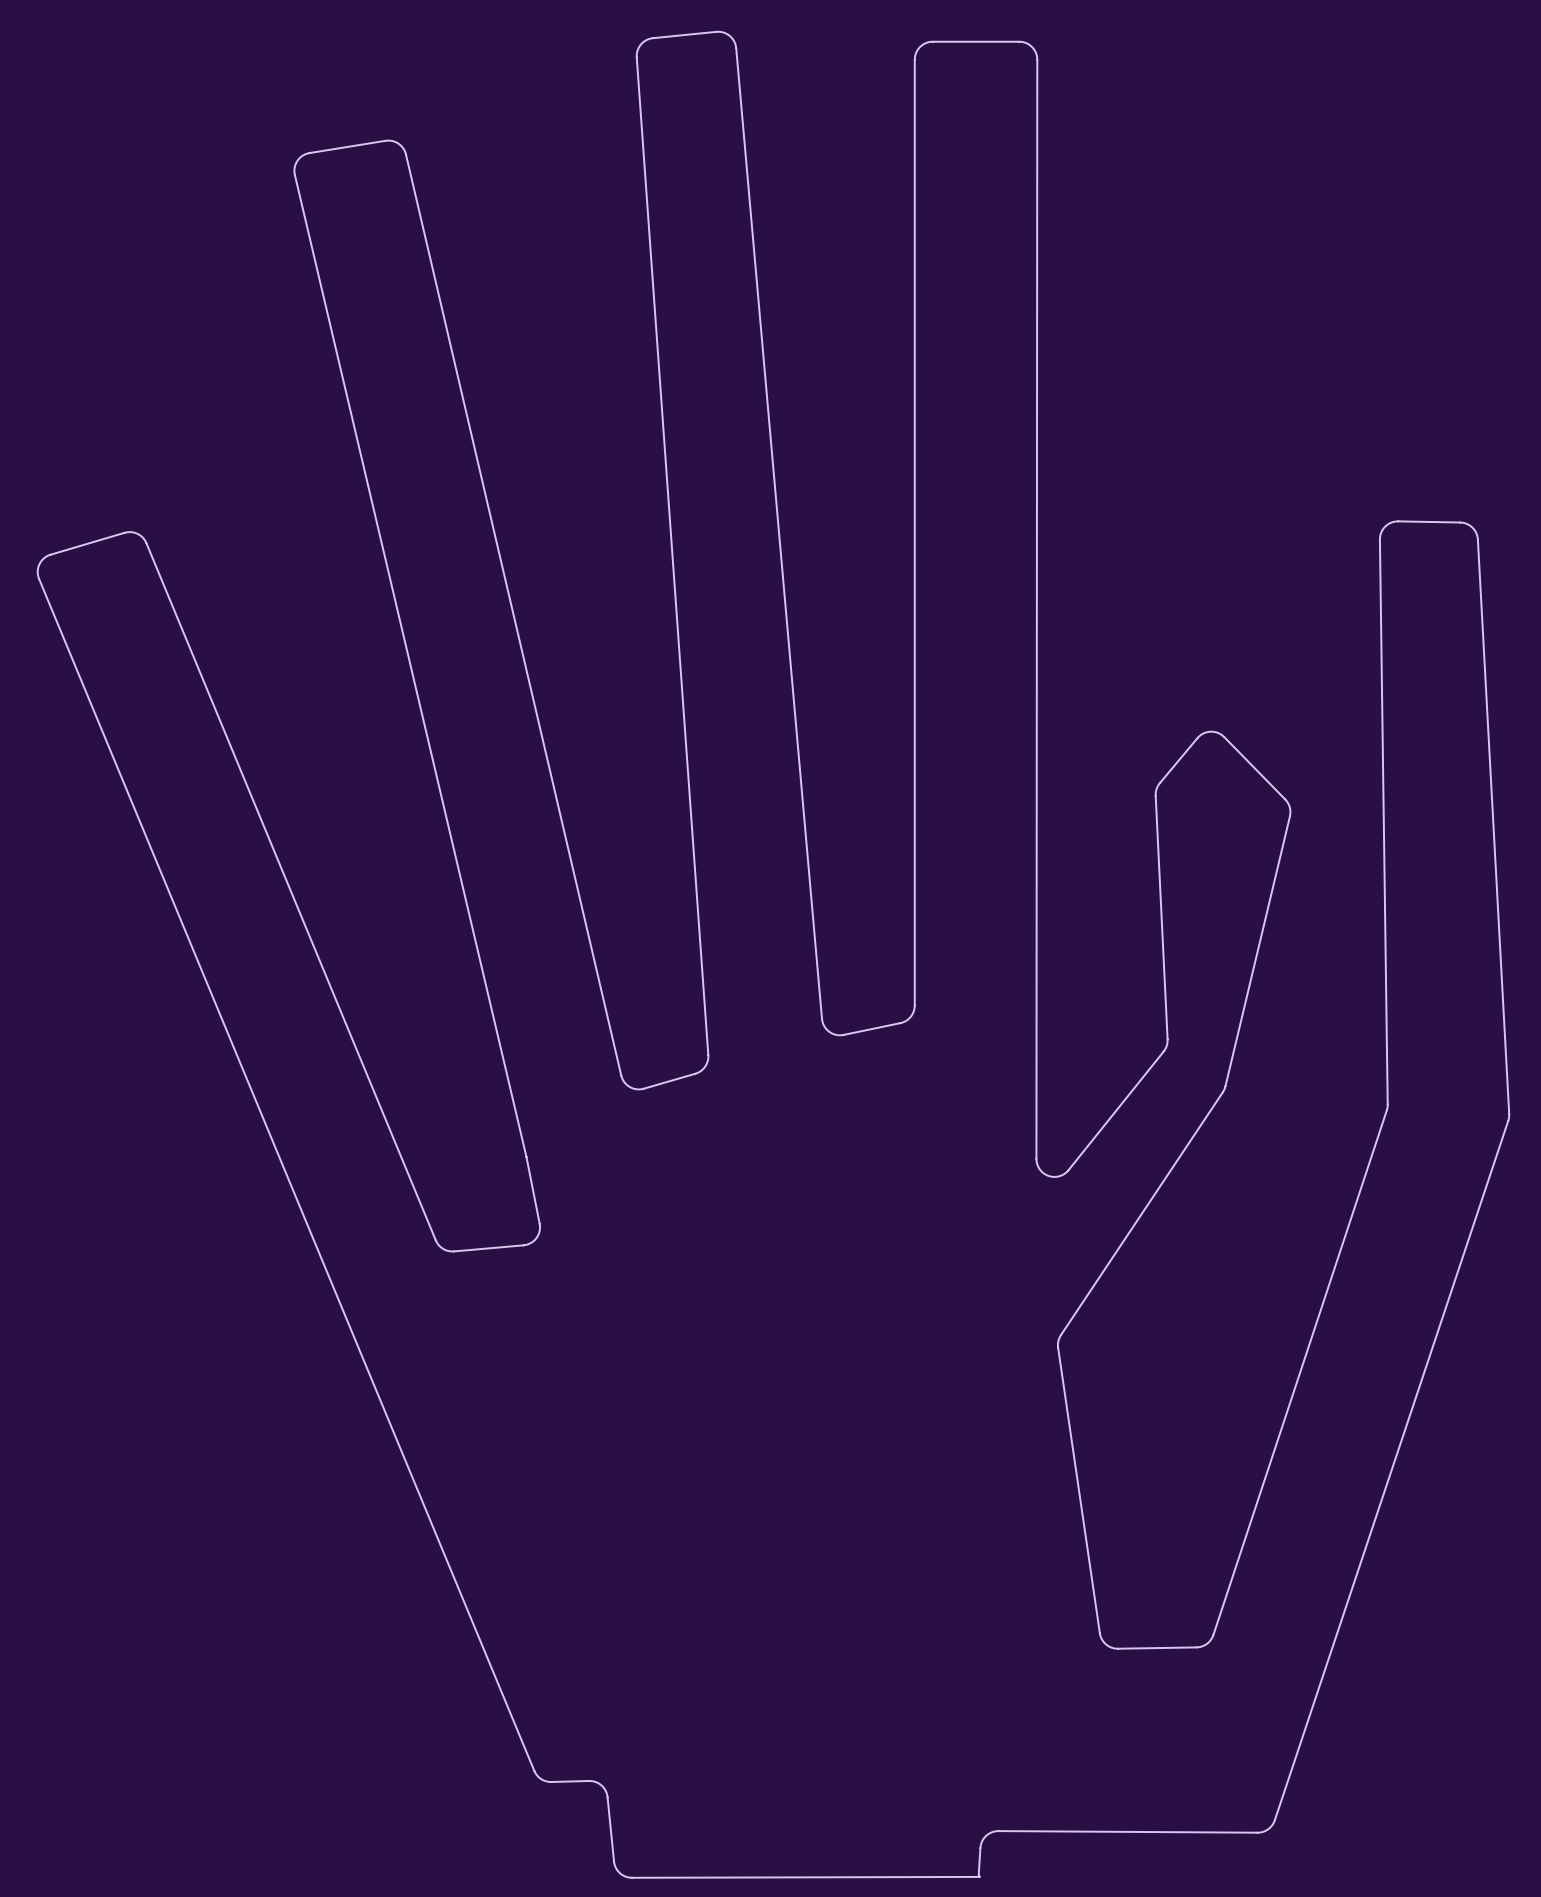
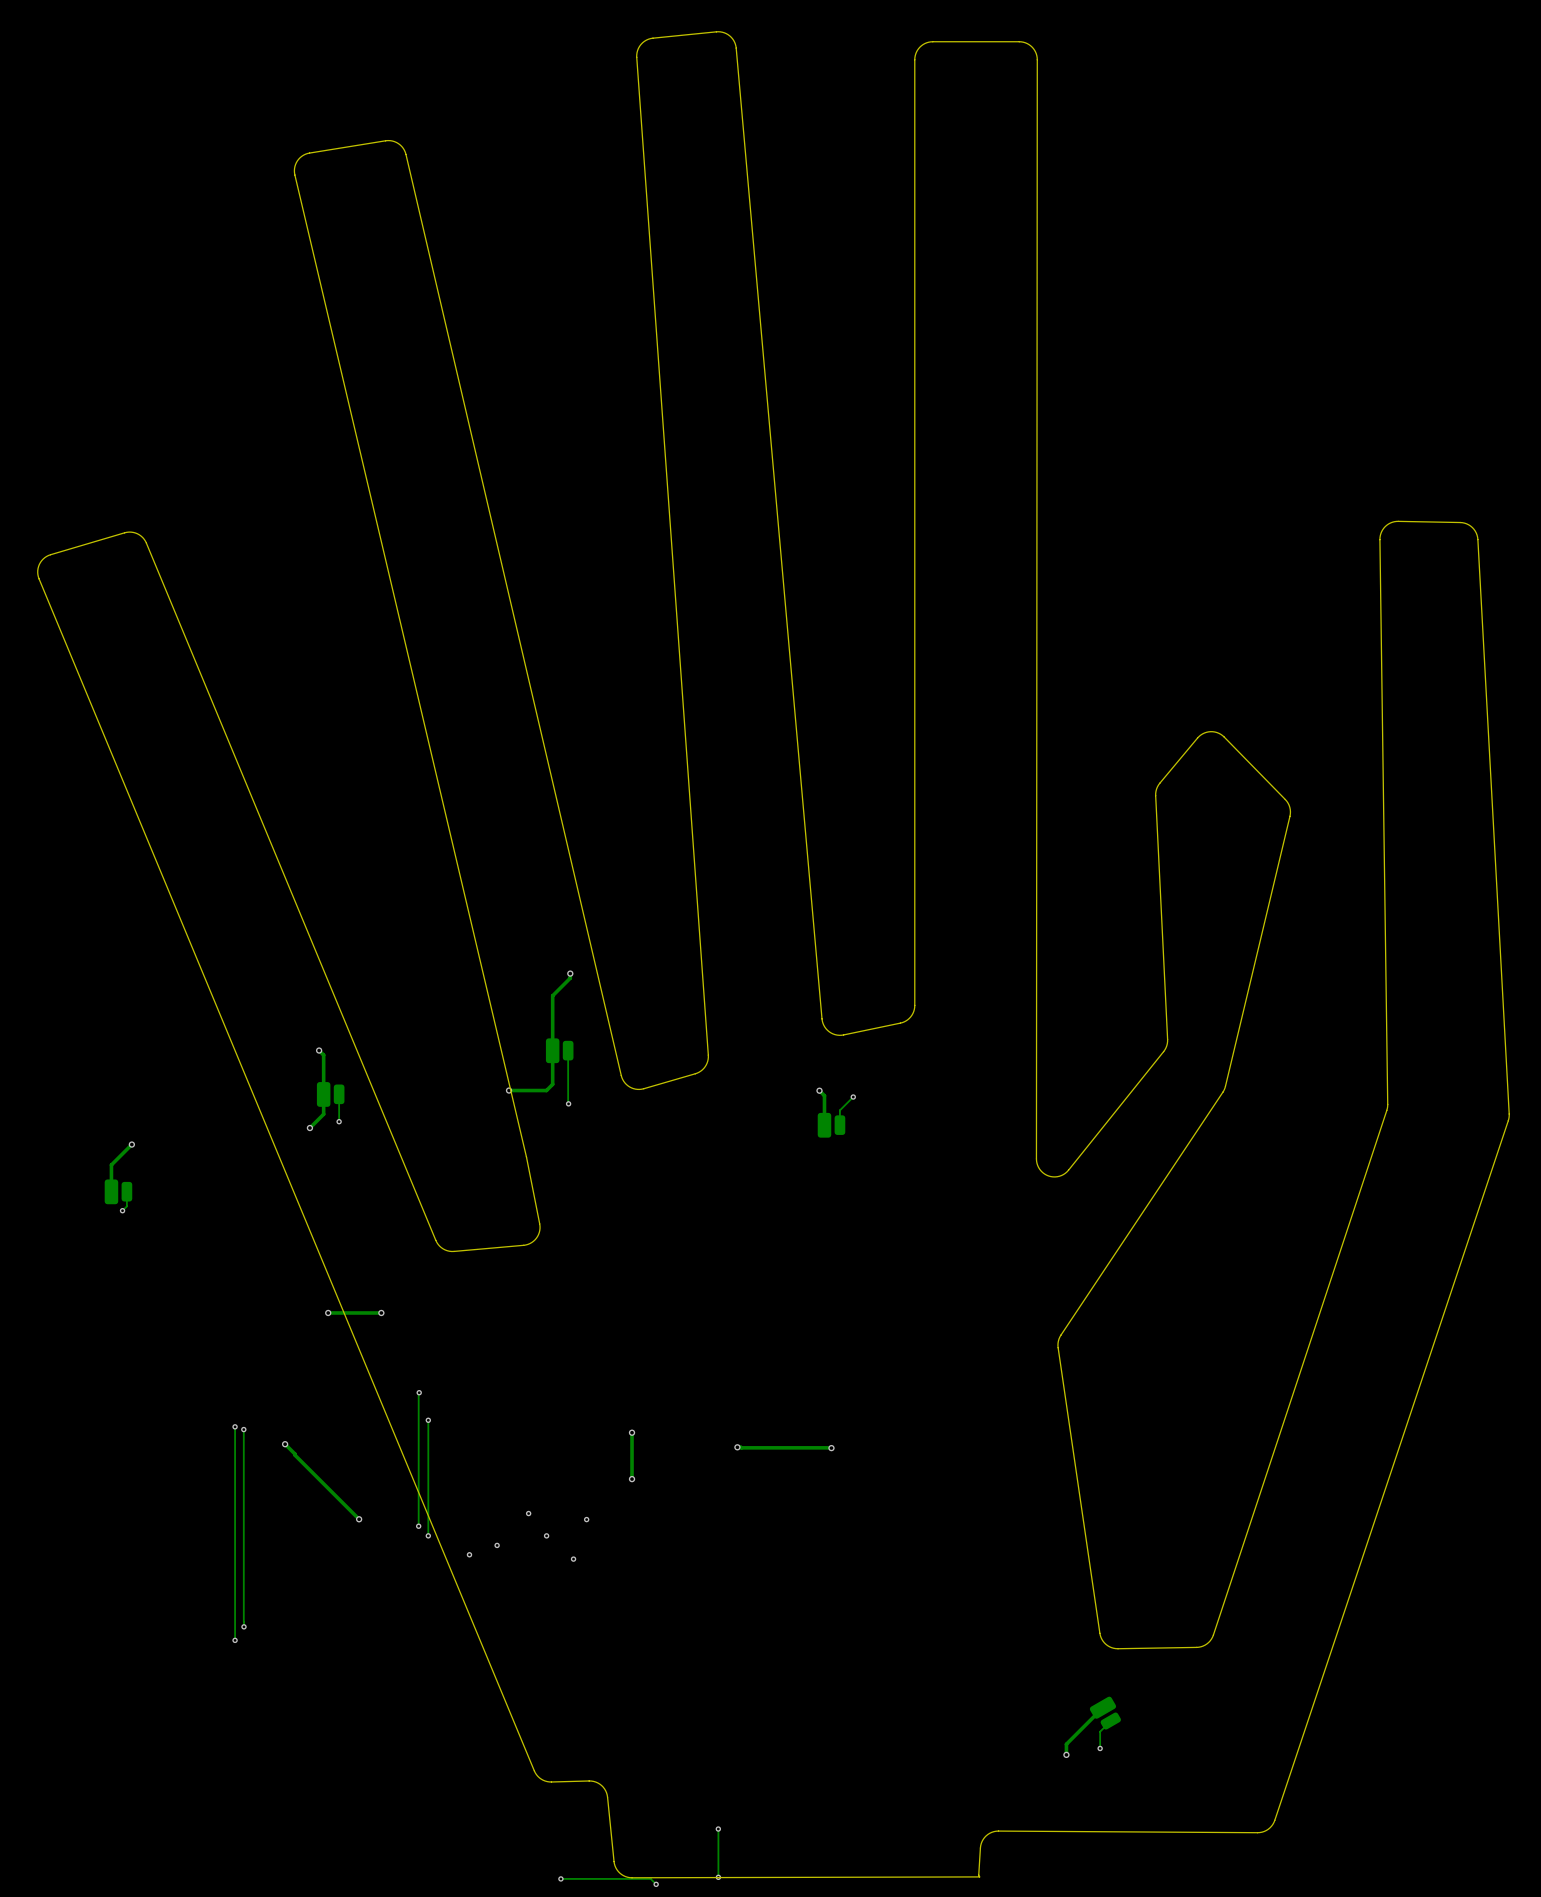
track: none -> (570, 973) (570, 978) (552, 995) (552, 1084) (546, 1090) (509, 1090)
via: none -> (570, 973)
track: none -> (319, 1050) (323, 1055) (323, 1114) (309, 1128)
via: none -> (319, 1050)
part: none -> (559, 1050)
track: none -> (568, 1050) (568, 1103)
via: none -> (509, 1090)
track: none -> (819, 1090) (824, 1095) (824, 1125)
via: none -> (819, 1090)
part: none -> (330, 1094)
track: none -> (339, 1094) (339, 1121)
track: none -> (853, 1097) (839, 1110) (839, 1125)
via: none -> (853, 1097)
via: none -> (568, 1103)
via: none -> (339, 1121)
part: none -> (831, 1125)
via: none -> (309, 1128)
track: none -> (131, 1144) (111, 1164) (111, 1191)
via: none -> (131, 1144)
part: none -> (118, 1191)
track: none -> (126, 1191) (126, 1206) (122, 1210)
via: none -> (122, 1210)
via: none -> (328, 1312)
track: none -> (381, 1312) (328, 1312)
via: none -> (381, 1312)
track: none -> (419, 1392) (418, 1526)
via: none -> (419, 1392)
track: none -> (428, 1420) (428, 1535)
via: none -> (428, 1420)
track: none -> (235, 1426) (235, 1640)
via: none -> (235, 1426)
track: none -> (243, 1429) (243, 1626)
via: none -> (243, 1429)
track: none -> (632, 1432) (632, 1479)
via: none -> (632, 1432)
track: none -> (285, 1444) (359, 1519)
via: none -> (285, 1444)
track: none -> (737, 1447) (831, 1448)
via: none -> (737, 1447)
via: none -> (831, 1448)
via: none -> (632, 1479)
via: none -> (528, 1513)
via: none -> (359, 1519)
via: none -> (586, 1519)
via: none -> (418, 1526)
via: none -> (428, 1535)
via: none -> (546, 1535)
via: none -> (497, 1545)
via: none -> (469, 1554)
via: none -> (573, 1559)
via: none -> (243, 1626)
via: none -> (235, 1640)
track: none -> (1102, 1707) (1066, 1744) (1066, 1754)
part: none -> (1105, 1713)
track: none -> (1110, 1721) (1100, 1731) (1100, 1748)
via: none -> (1100, 1748)
via: none -> (1066, 1754)
track: none -> (718, 1829) (718, 1877)
via: none -> (718, 1829)
via: none -> (718, 1877)
track: none -> (560, 1878) (650, 1878) (656, 1884)
via: none -> (560, 1878)
via: none -> (656, 1884)

